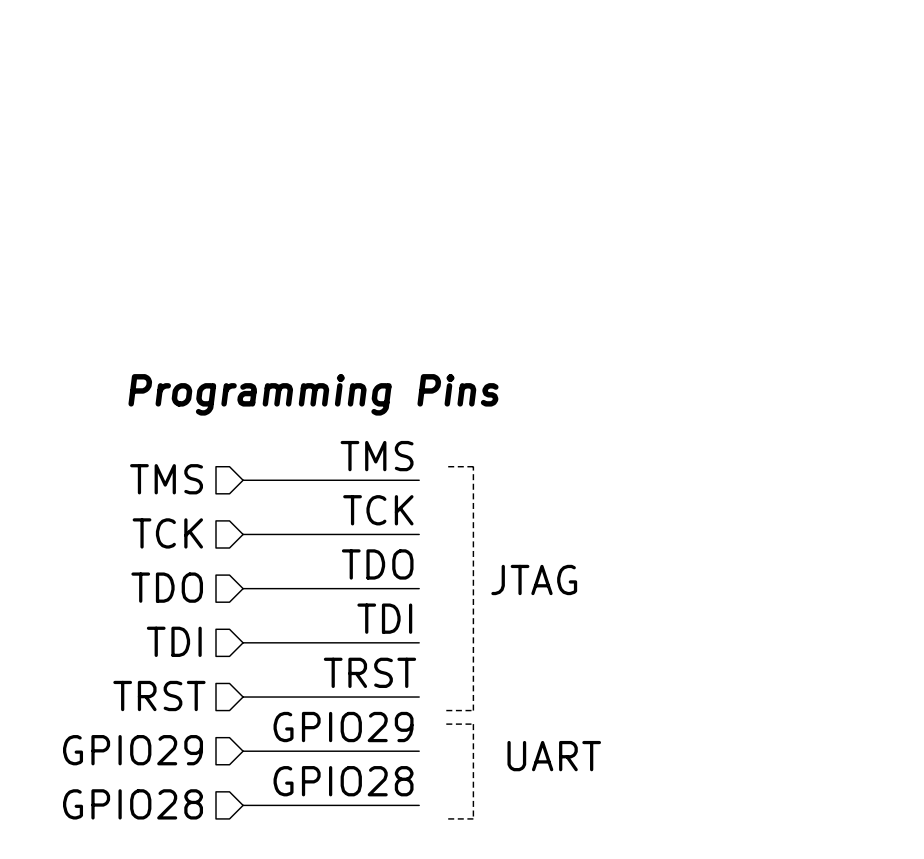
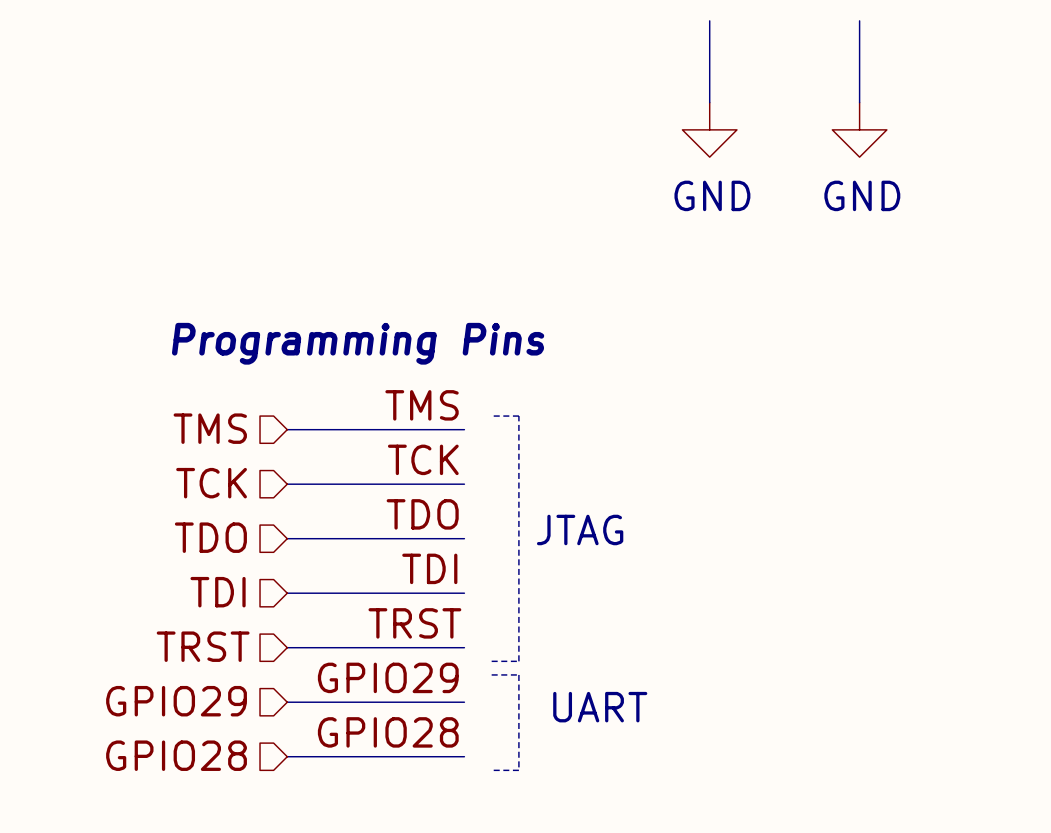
wire: none -> (709, 20) (709, 102)
wire: none -> (859, 20) (859, 102)
power symbol: none -> GND (709, 129)
power symbol: none -> GND (859, 129)

